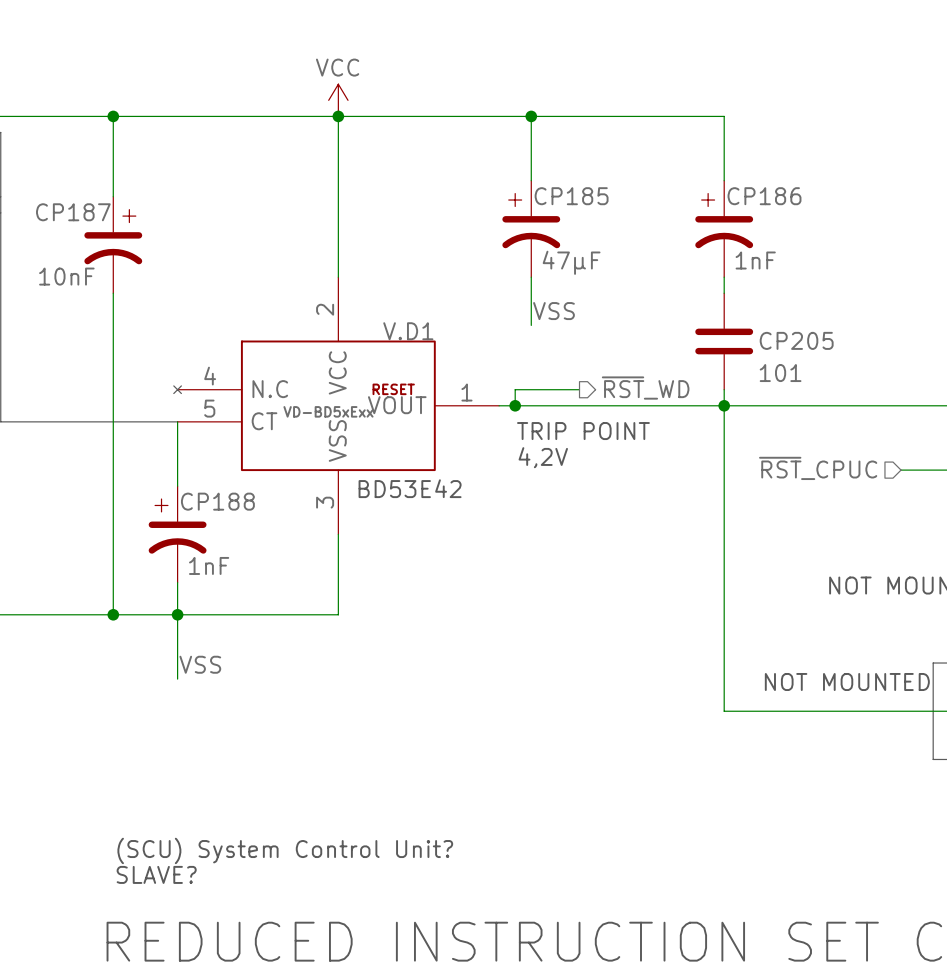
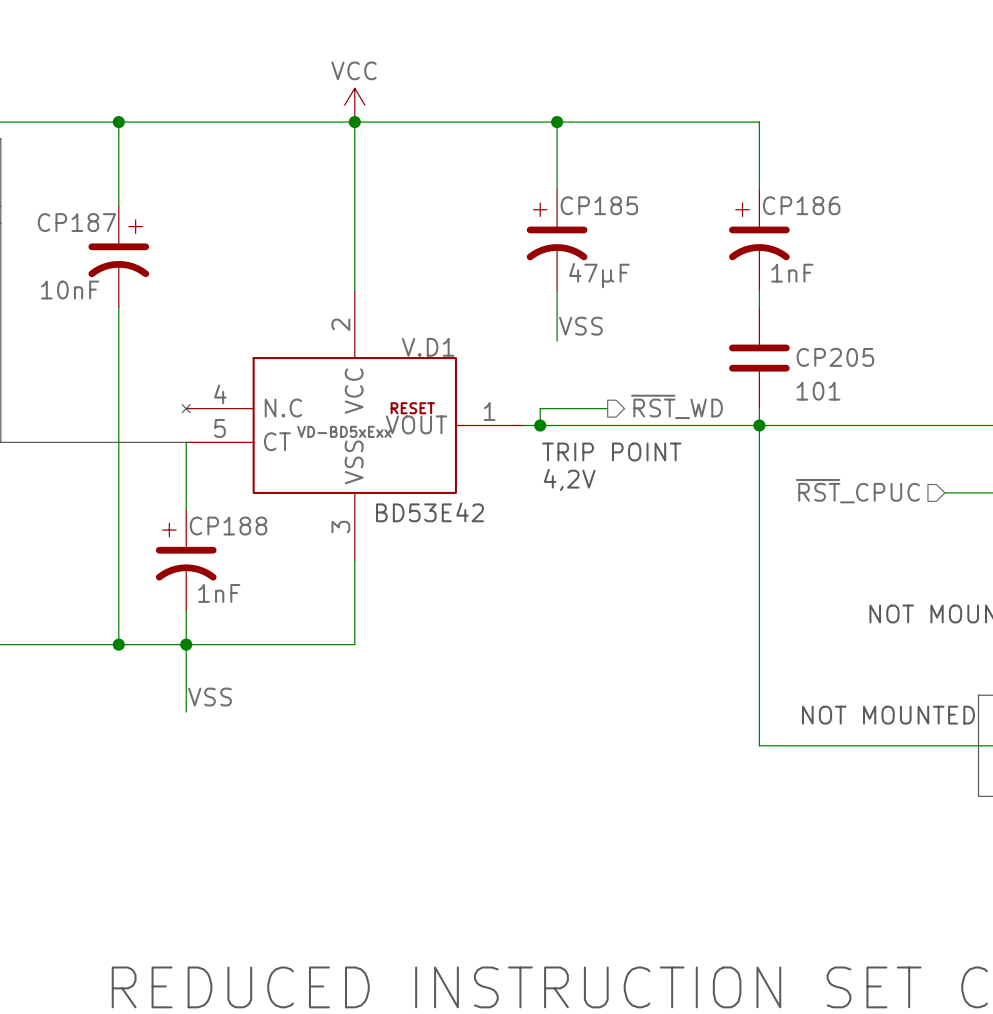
text: (SCU) System Control Unit? (285, 850) -> none
text: SLAVE? (156, 874) -> none

